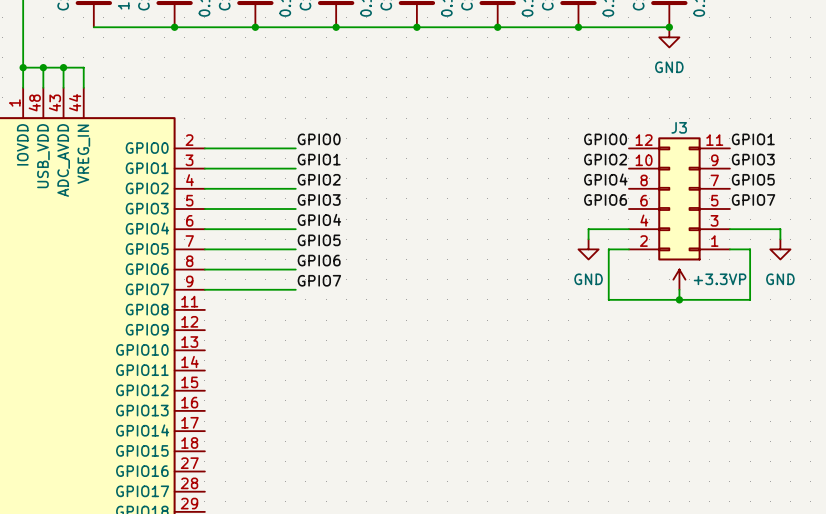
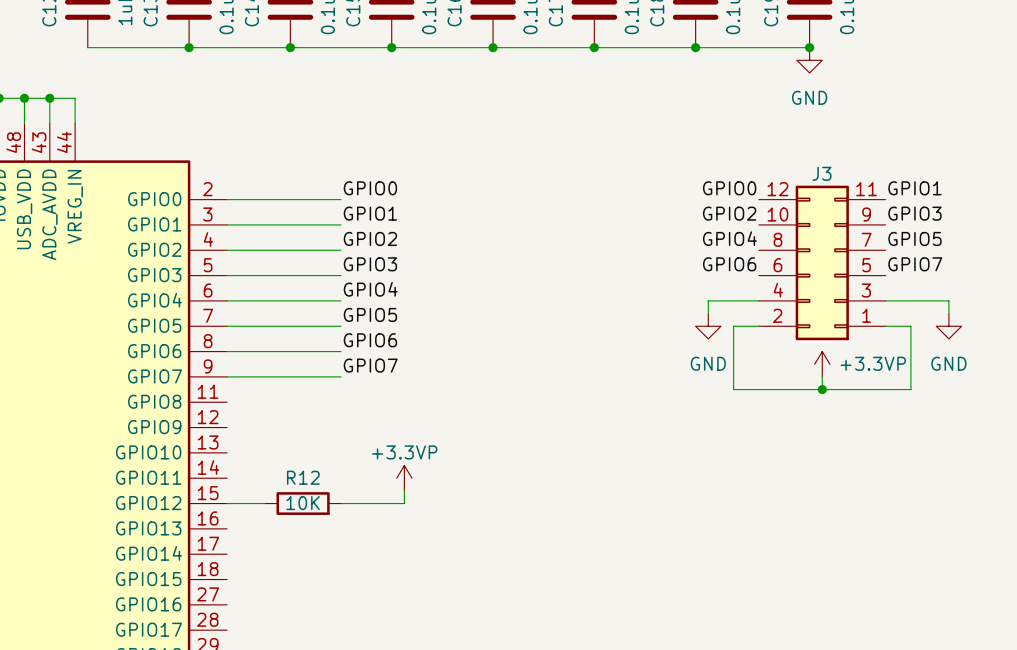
power symbol: none -> +3.3VP (404, 478)
wire: none -> (404, 490) (404, 503) (341, 503)
wire: none -> (227, 503) (265, 503)
R12: none -> 10K (303, 503)

